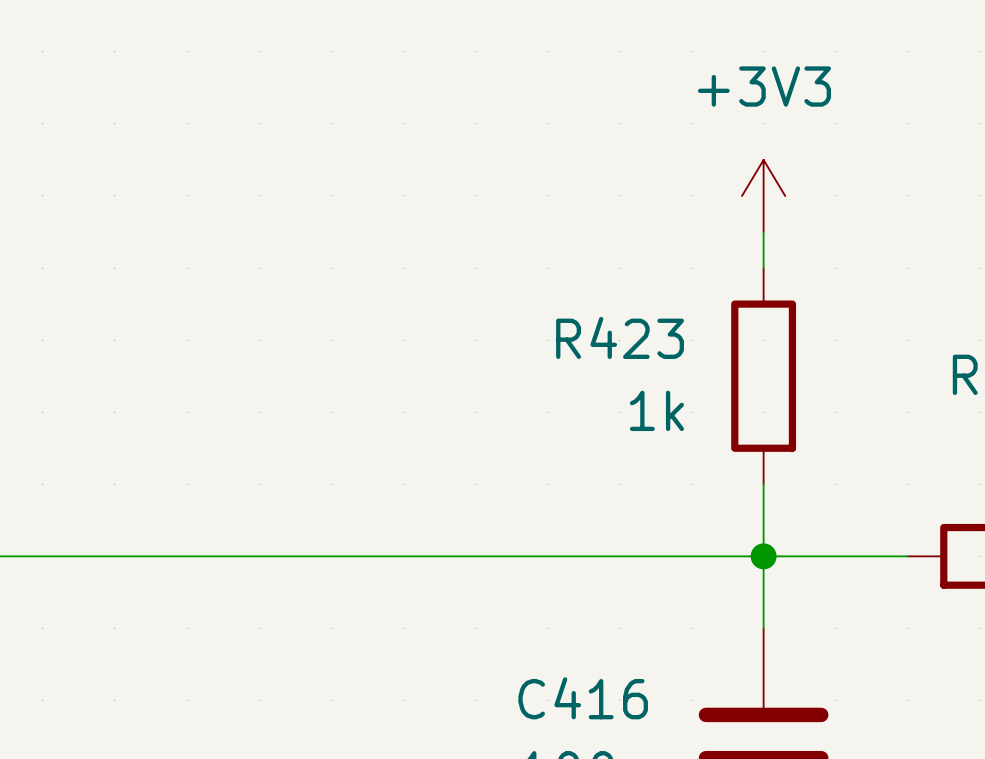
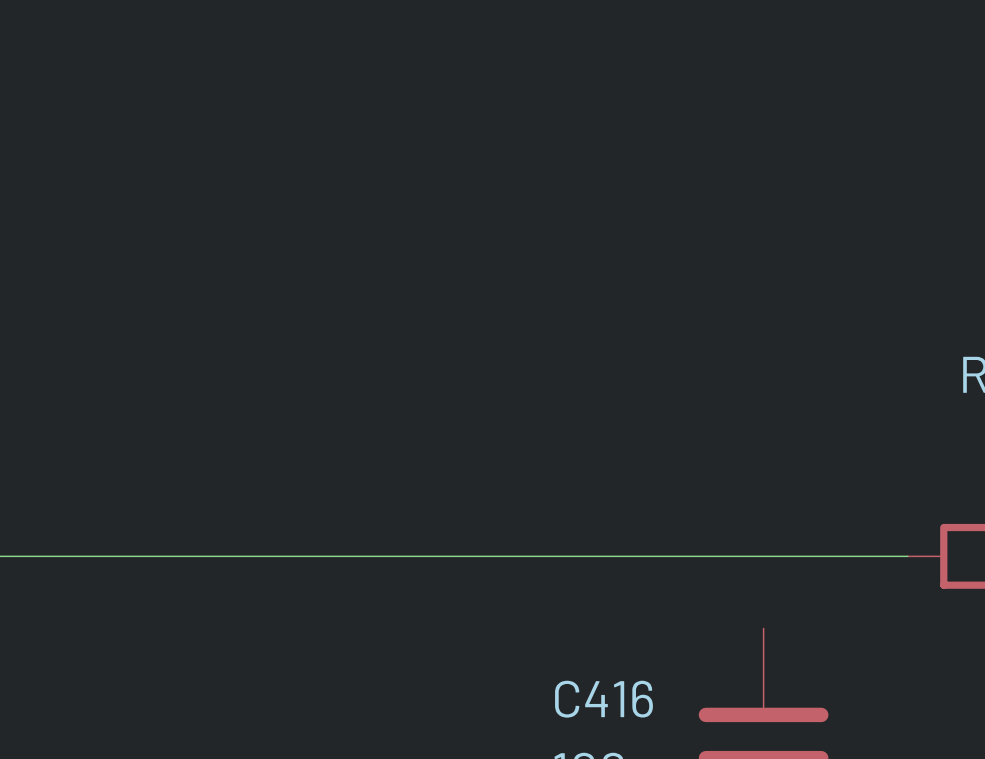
power symbol: +3V3 (763, 195) -> none
wire: (763, 232) (763, 268) -> none
R423: 1k (763, 376) -> none
wire: (763, 484) (763, 628) -> none
junction: (763, 556) -> none

